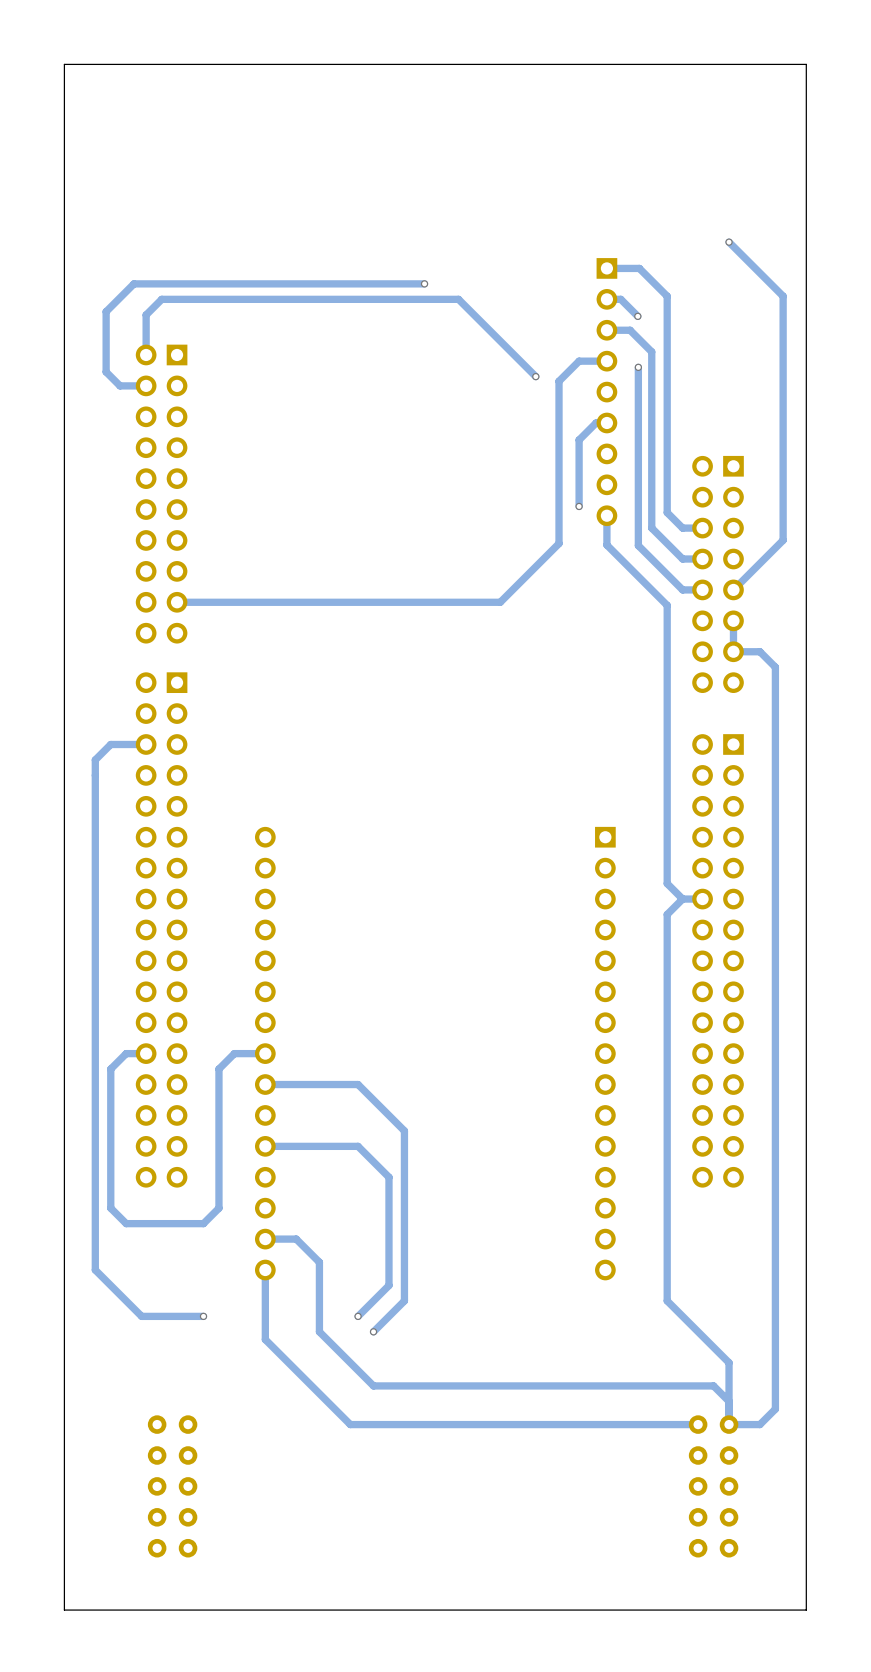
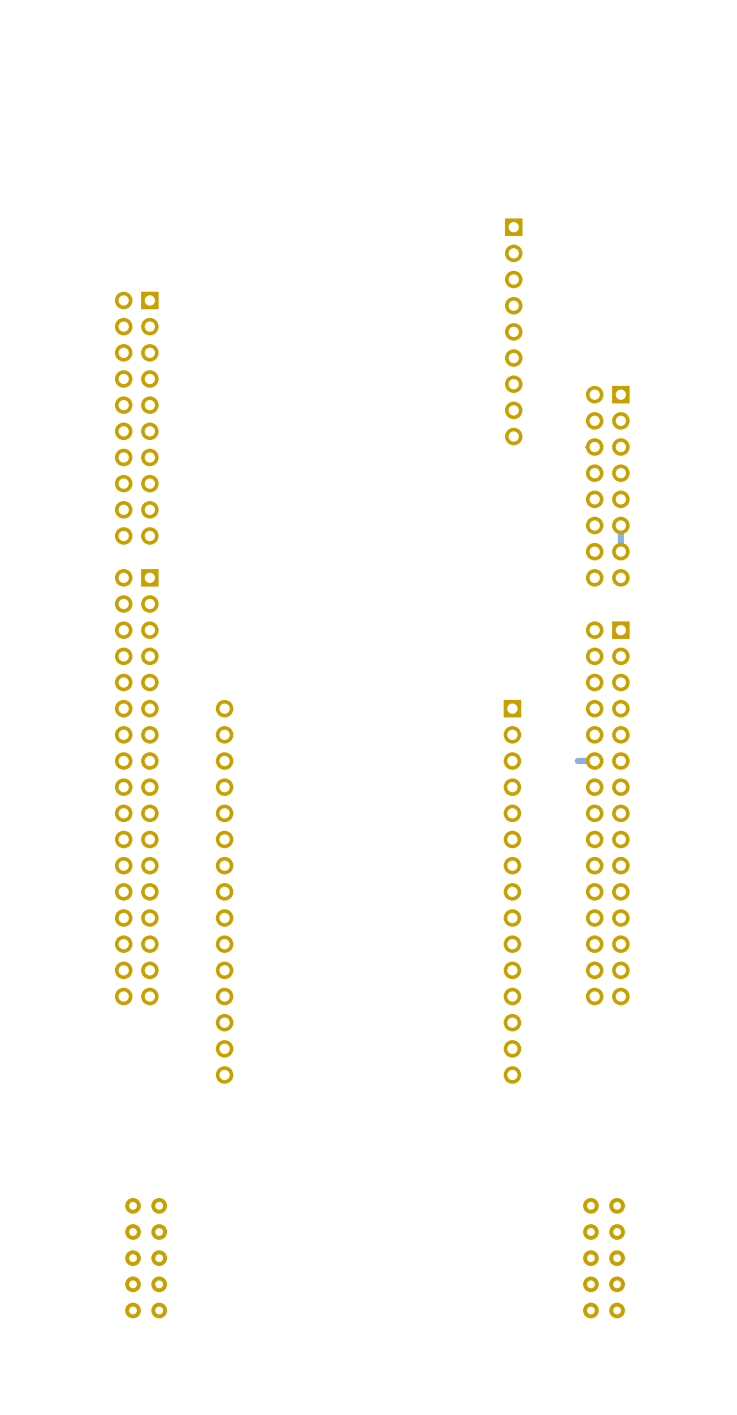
board edge: (806, 64) (64, 64) (64, 1610) (806, 1610) (806, 64) -> none
track: (729, 242) (783, 296) (783, 540) (733, 589) -> none
via: (729, 242) -> none
track: (606, 268) (639, 268) (667, 296) (667, 512) (682, 528) (702, 528) -> none
track: (424, 283) (133, 283) (106, 311) (106, 371) (120, 385) (146, 385) -> none
via: (424, 283) -> none
track: (606, 299) (620, 299) (637, 316) -> none
via: (637, 316) -> none
track: (606, 330) (630, 330) (651, 351) (651, 528) (682, 559) (702, 559) -> none
track: (146, 354) (146, 314) (161, 299) (458, 299) (535, 376) -> none
track: (606, 361) (579, 361) (559, 381) (559, 543) (500, 602) (177, 602) -> none
track: (638, 367) (638, 545) (682, 589) (702, 589) -> none
via: (638, 367) -> none
via: (535, 376) -> none
track: (606, 422) (596, 422) (579, 439) (579, 506) -> none
via: (579, 506) -> none
track: (606, 515) (606, 545) (667, 605) (667, 883) (682, 899) (667, 914) (667, 1300) (729, 1362) (729, 1424) (759, 1424) (775, 1409) (775, 667) (759, 651) (733, 651) -> none
track: (146, 744) (110, 744) (95, 759) (95, 1270) (141, 1316) (203, 1316) -> none
track: (265, 1053) (234, 1053) (218, 1069) (218, 1208) (203, 1223) (126, 1223) (110, 1208) (110, 1069) (126, 1053) (146, 1053) -> none
track: (265, 1084) (358, 1084) (404, 1130) (404, 1300) (373, 1331) -> none
track: (265, 1146) (358, 1146) (388, 1177) (388, 1285) (358, 1316) -> none
track: (265, 1239) (296, 1239) (319, 1262) (319, 1331) (373, 1385) (713, 1385) (729, 1401) -> none
track: (265, 1270) (265, 1339) (350, 1424) (698, 1424) -> none
via: (203, 1316) -> none
via: (358, 1316) -> none
via: (373, 1331) -> none

